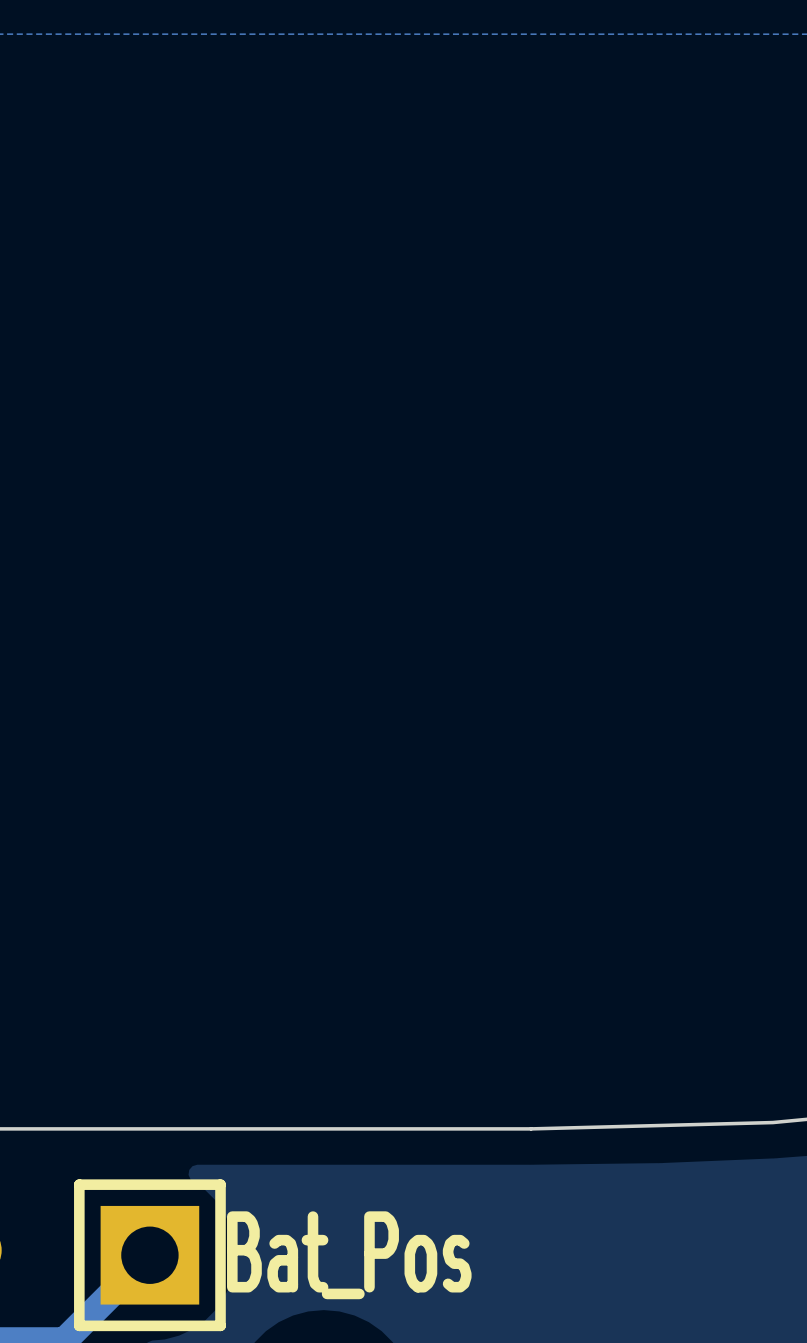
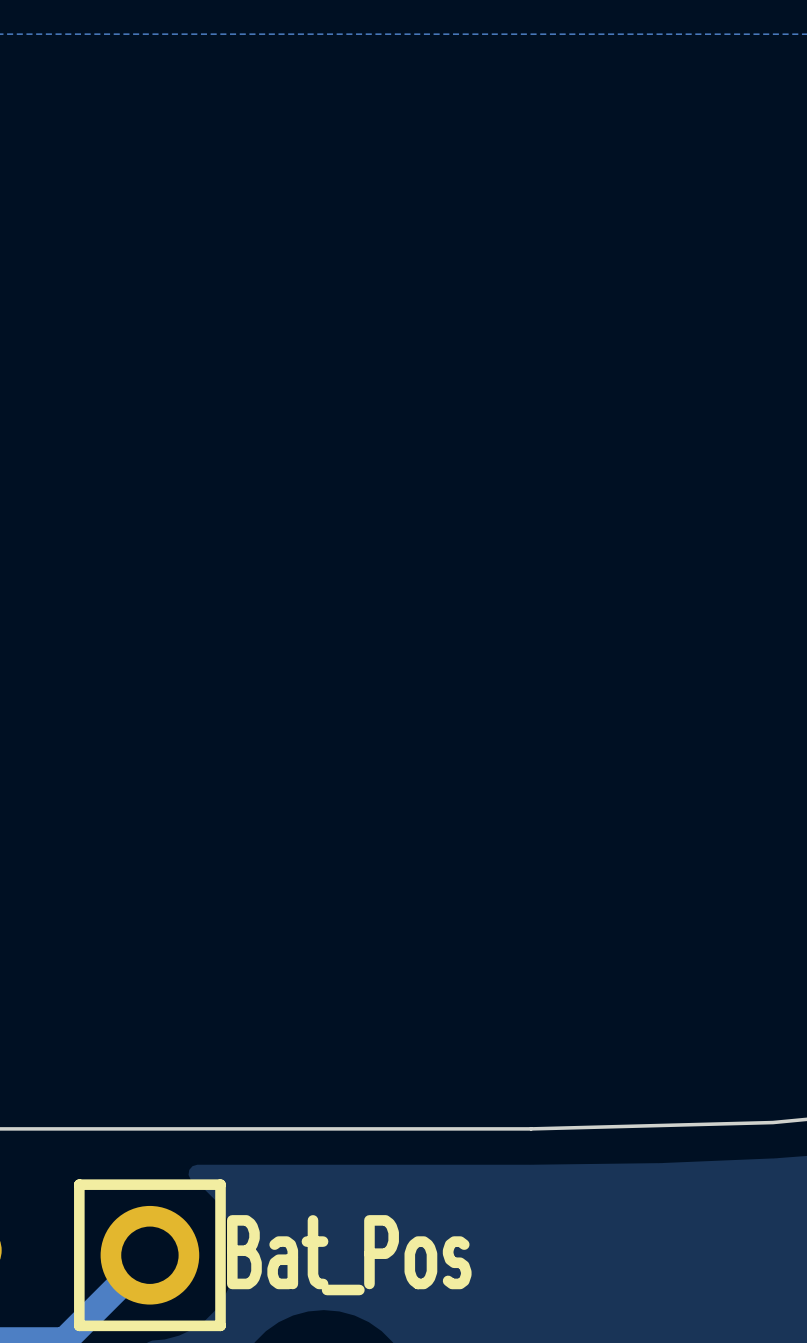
part footprint: [74, 1179, 226, 1332] -> [74, 1179, 226, 1332]

